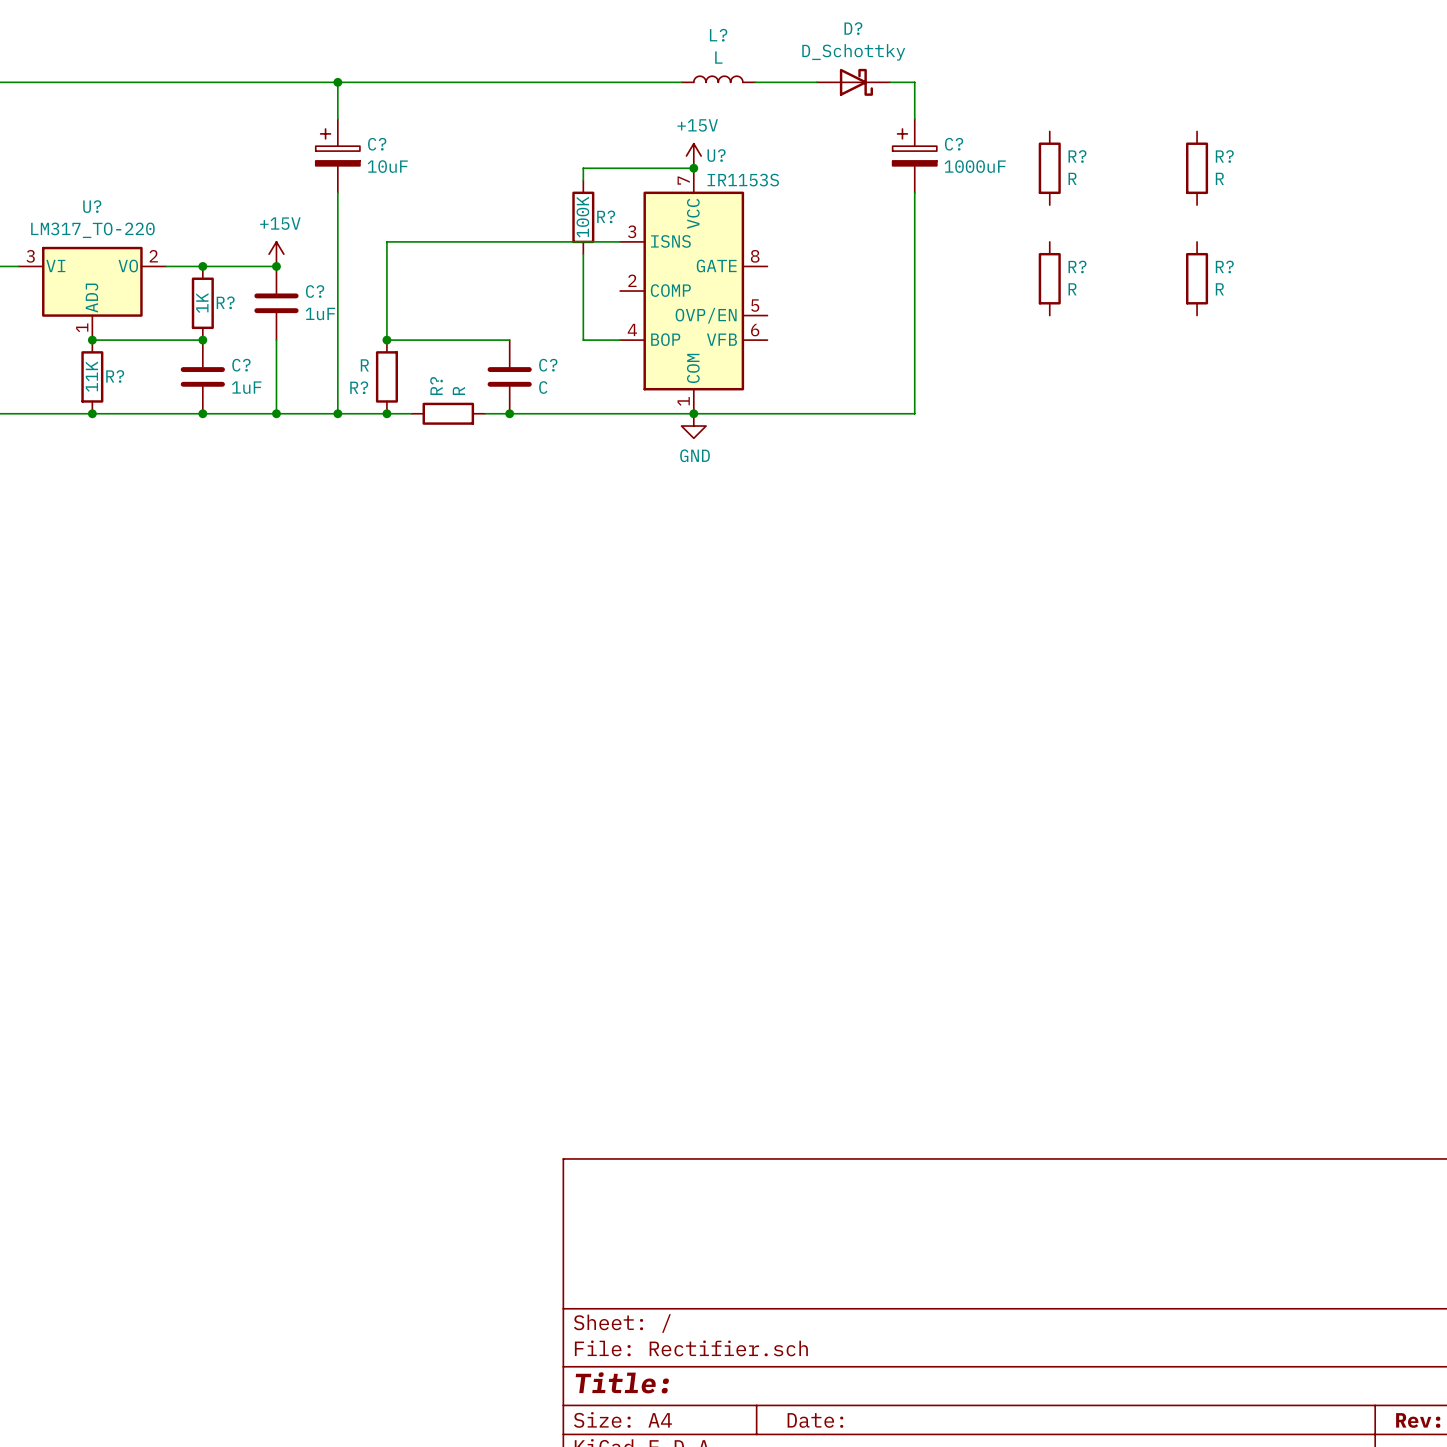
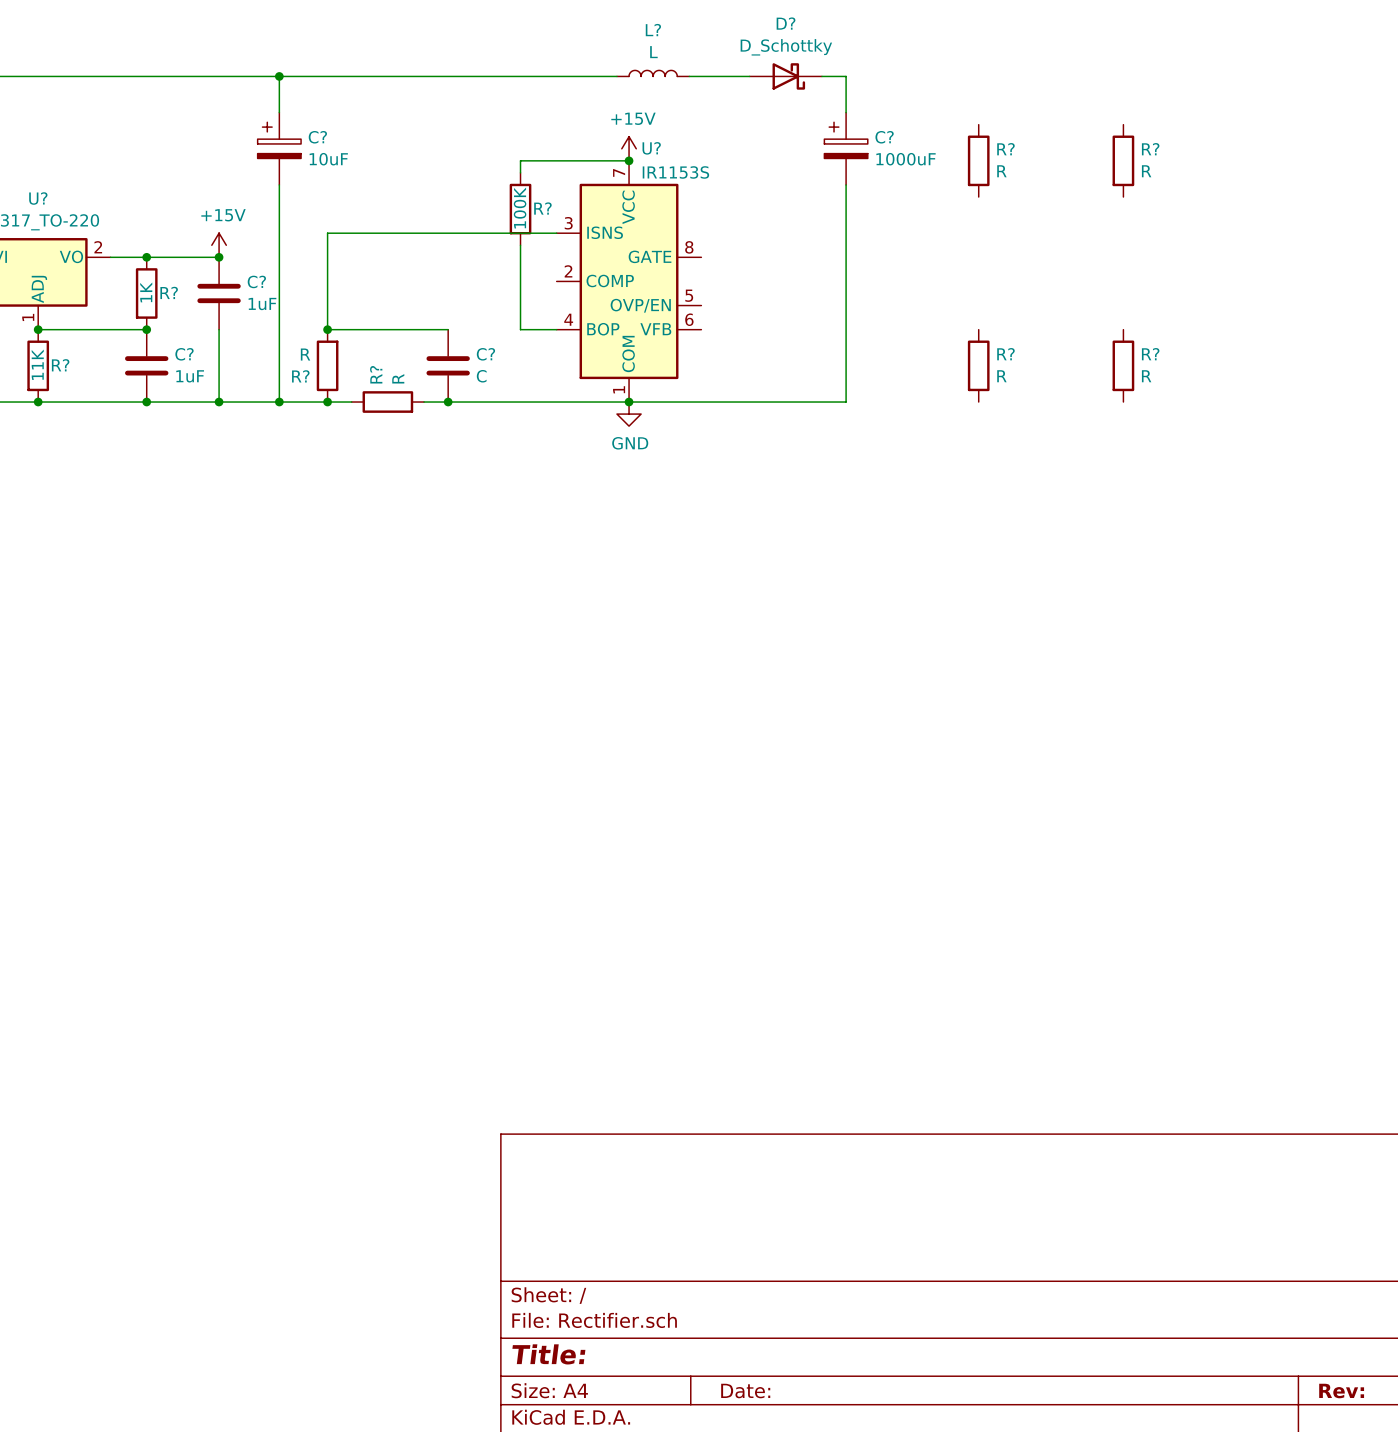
R?: R (1049, 278) -> none
R?: R (1197, 278) -> none
R?: none -> R (978, 365)
R?: none -> R (1123, 365)

